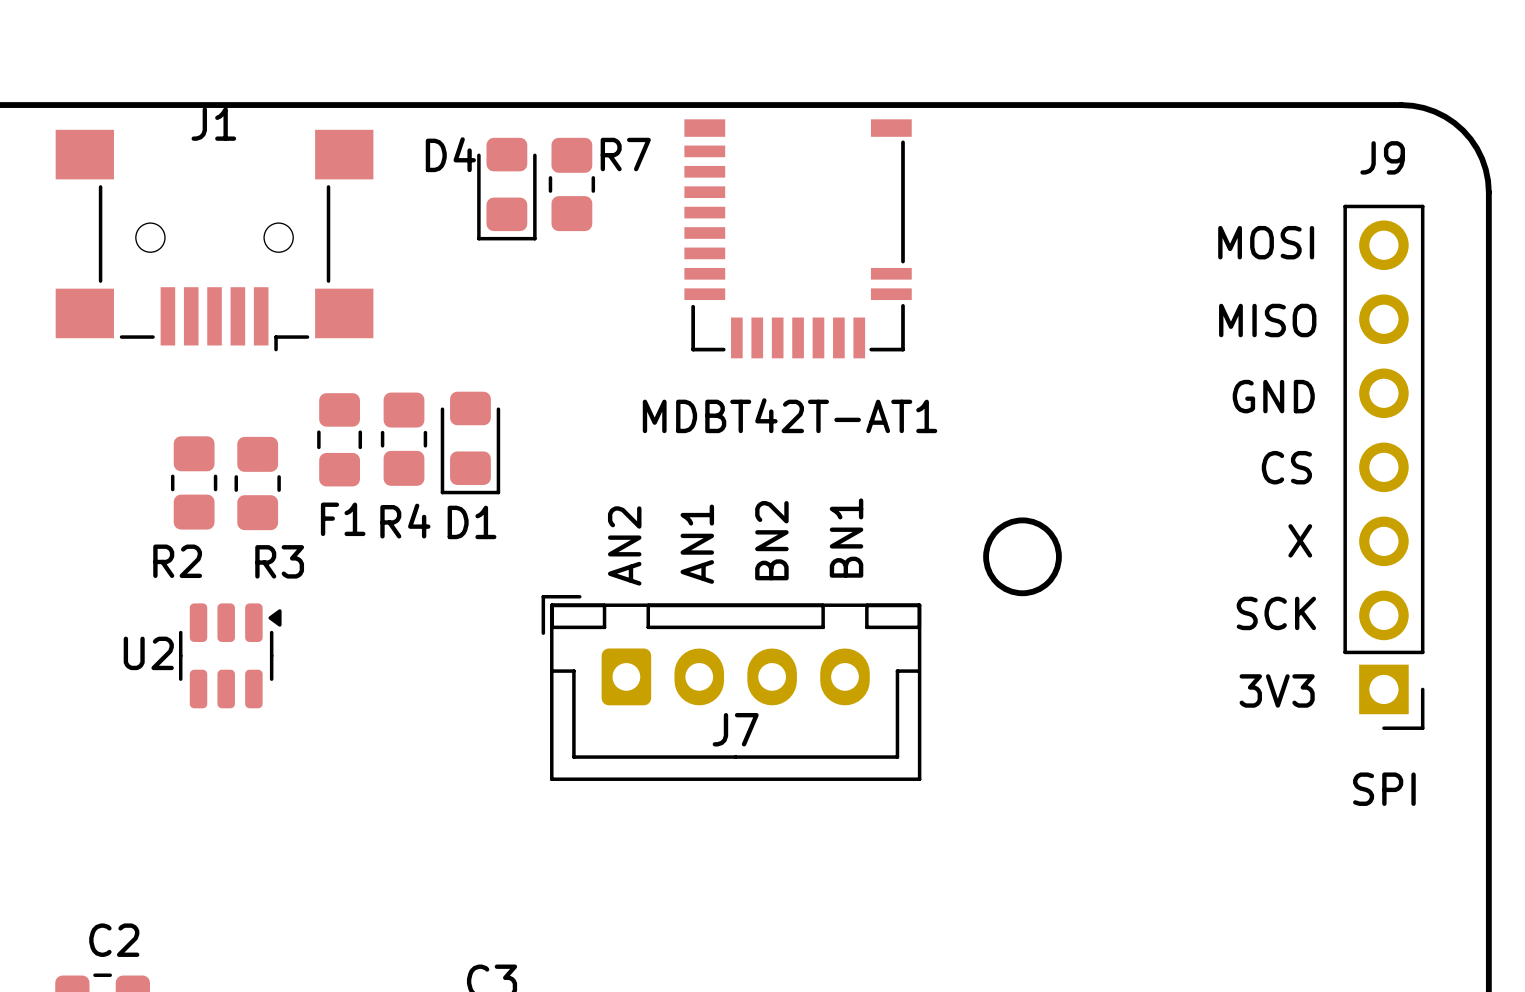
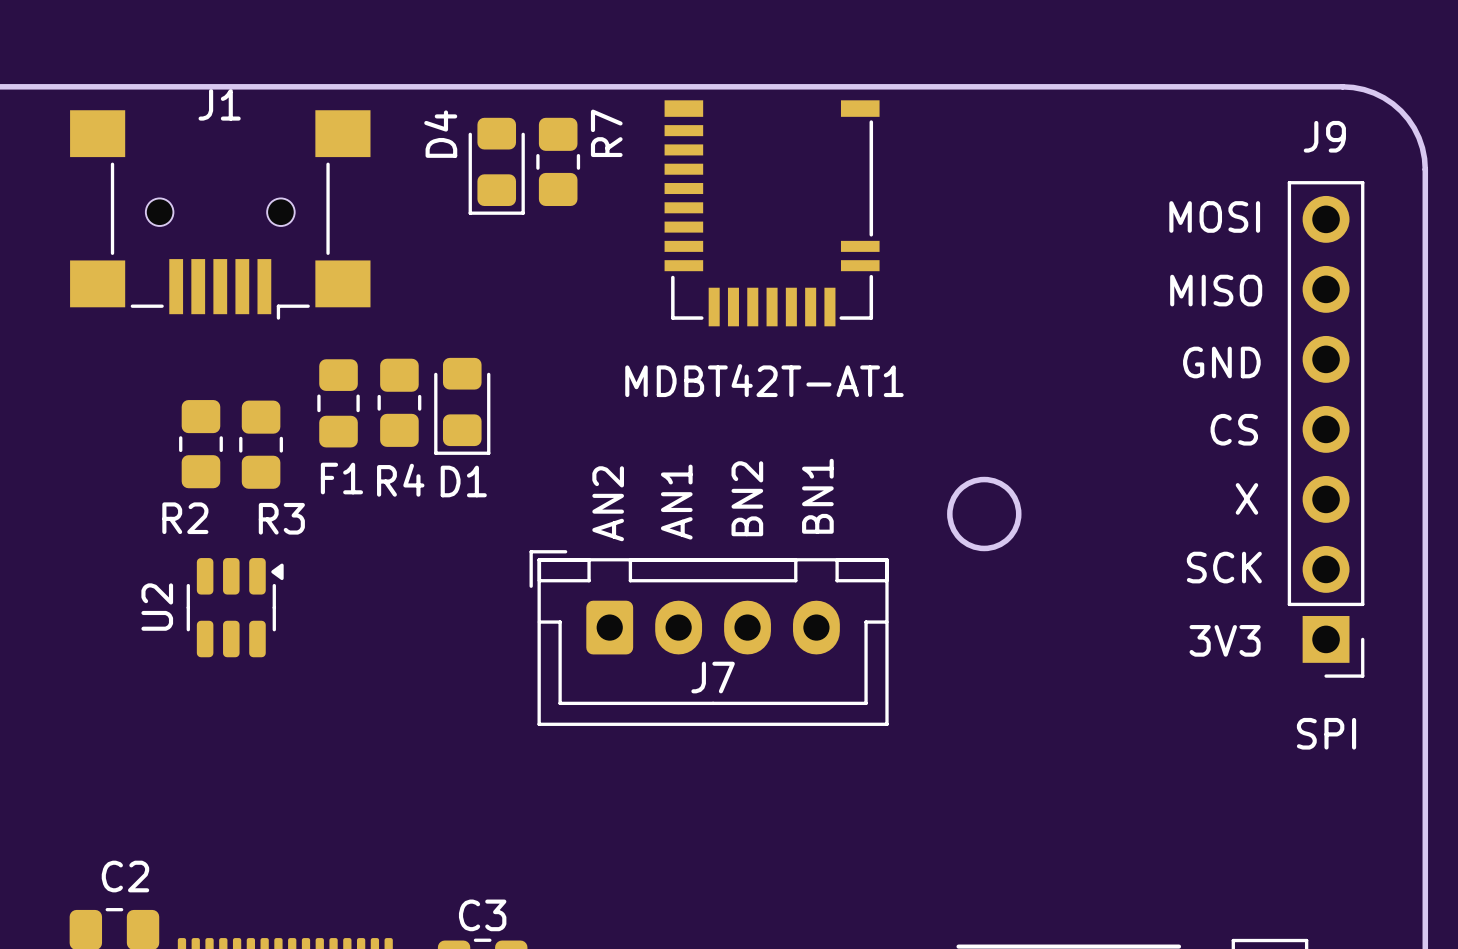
D4 name rotation: 0° (450, 154) -> 90° counterclockwise (440, 134)
R7 name rotation: 0° (625, 154) -> 90° counterclockwise (606, 133)
U2 name rotation: 0° (148, 653) -> 90° counterclockwise (157, 607)

